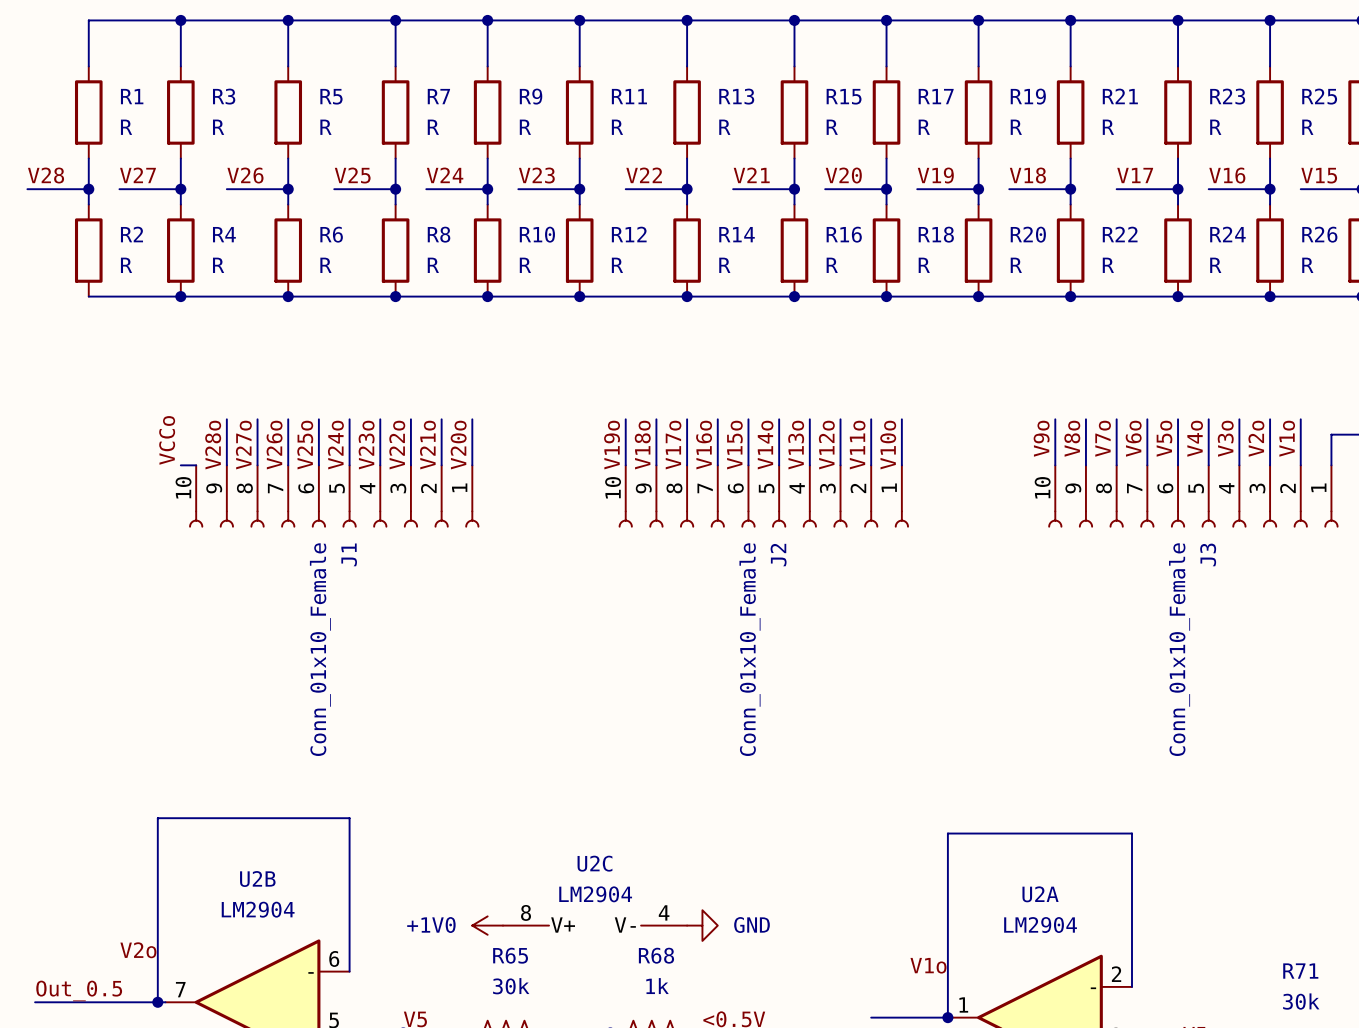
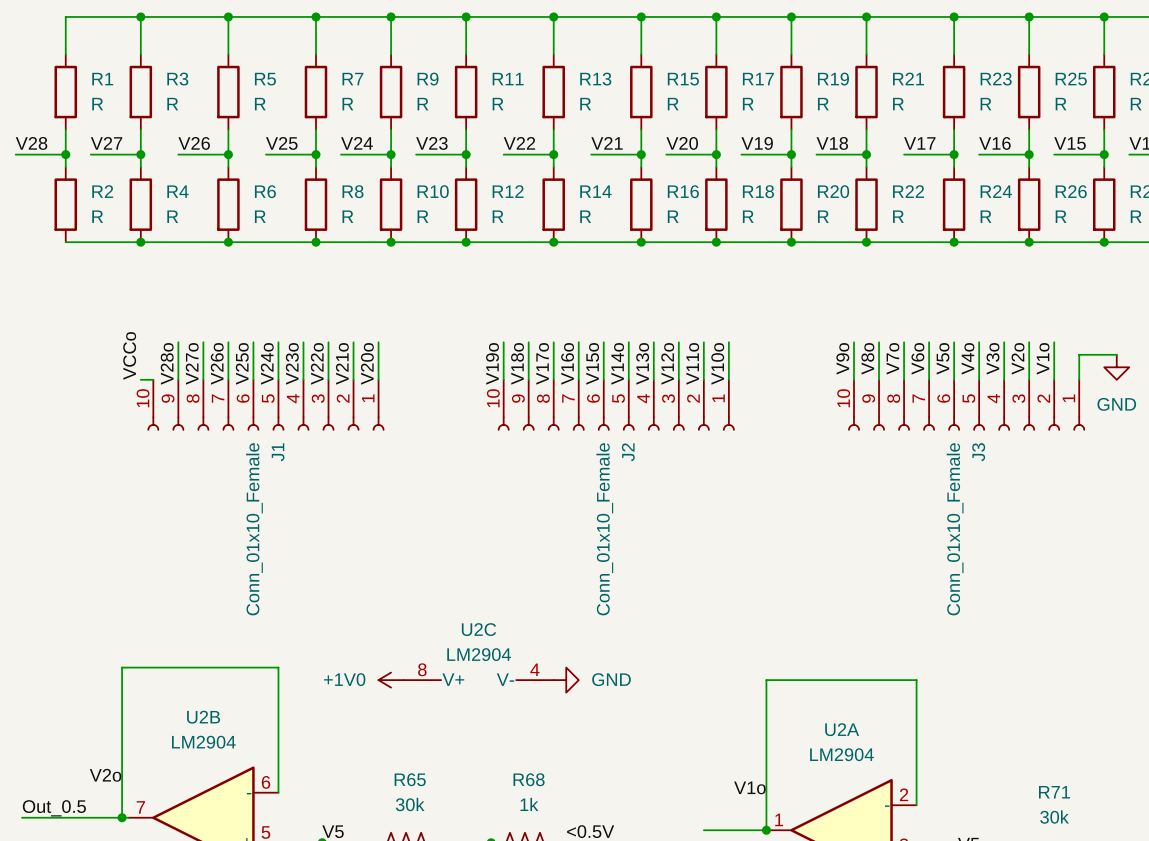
power symbol position: +1V0 (487, 925) -> +1V0 (391, 680)
U2C position: (595, 925) -> (478, 680)
power symbol position: GND (702, 925) -> GND (566, 680)

